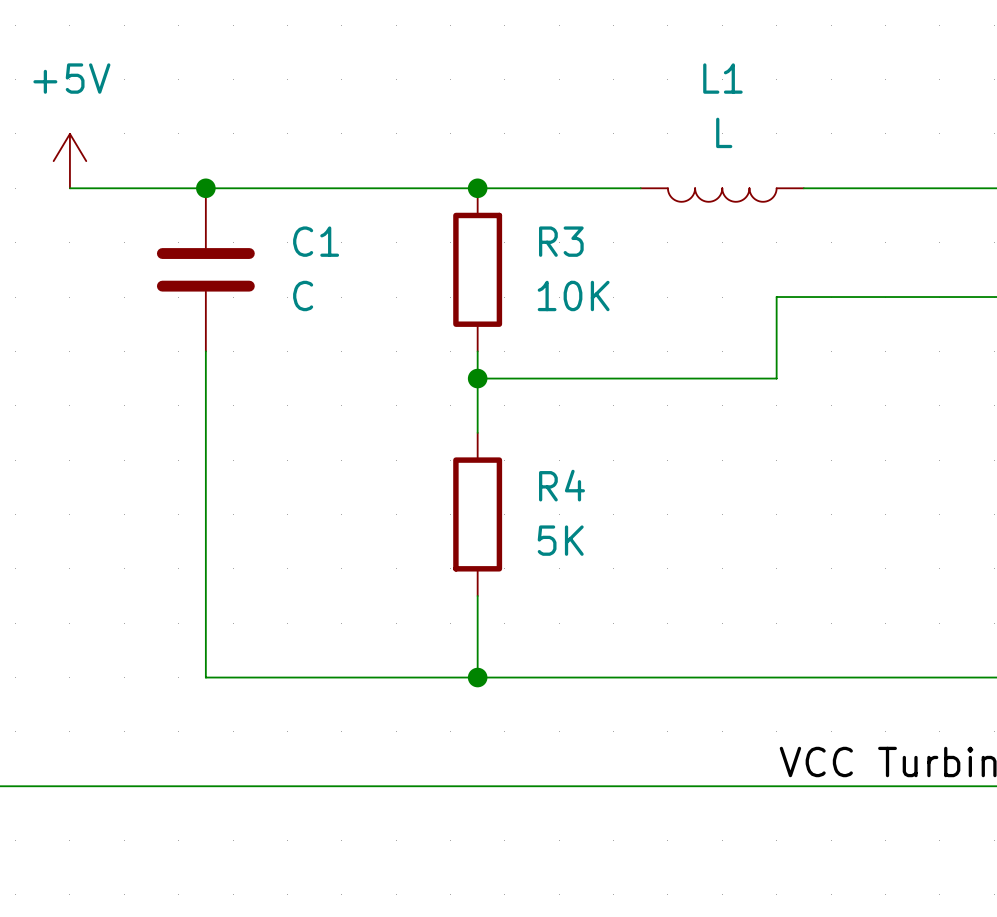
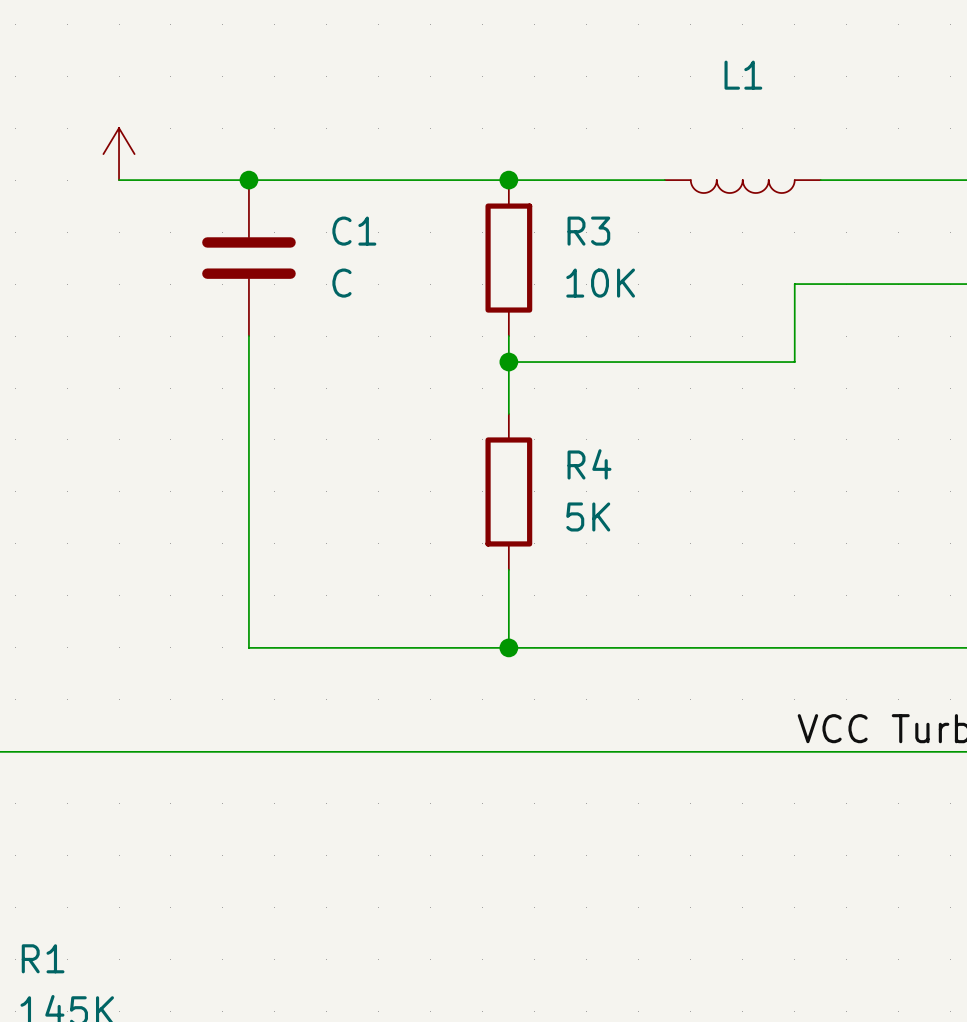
power symbol text: +5V (71, 78) -> none
L1 value: L (724, 132) -> none

